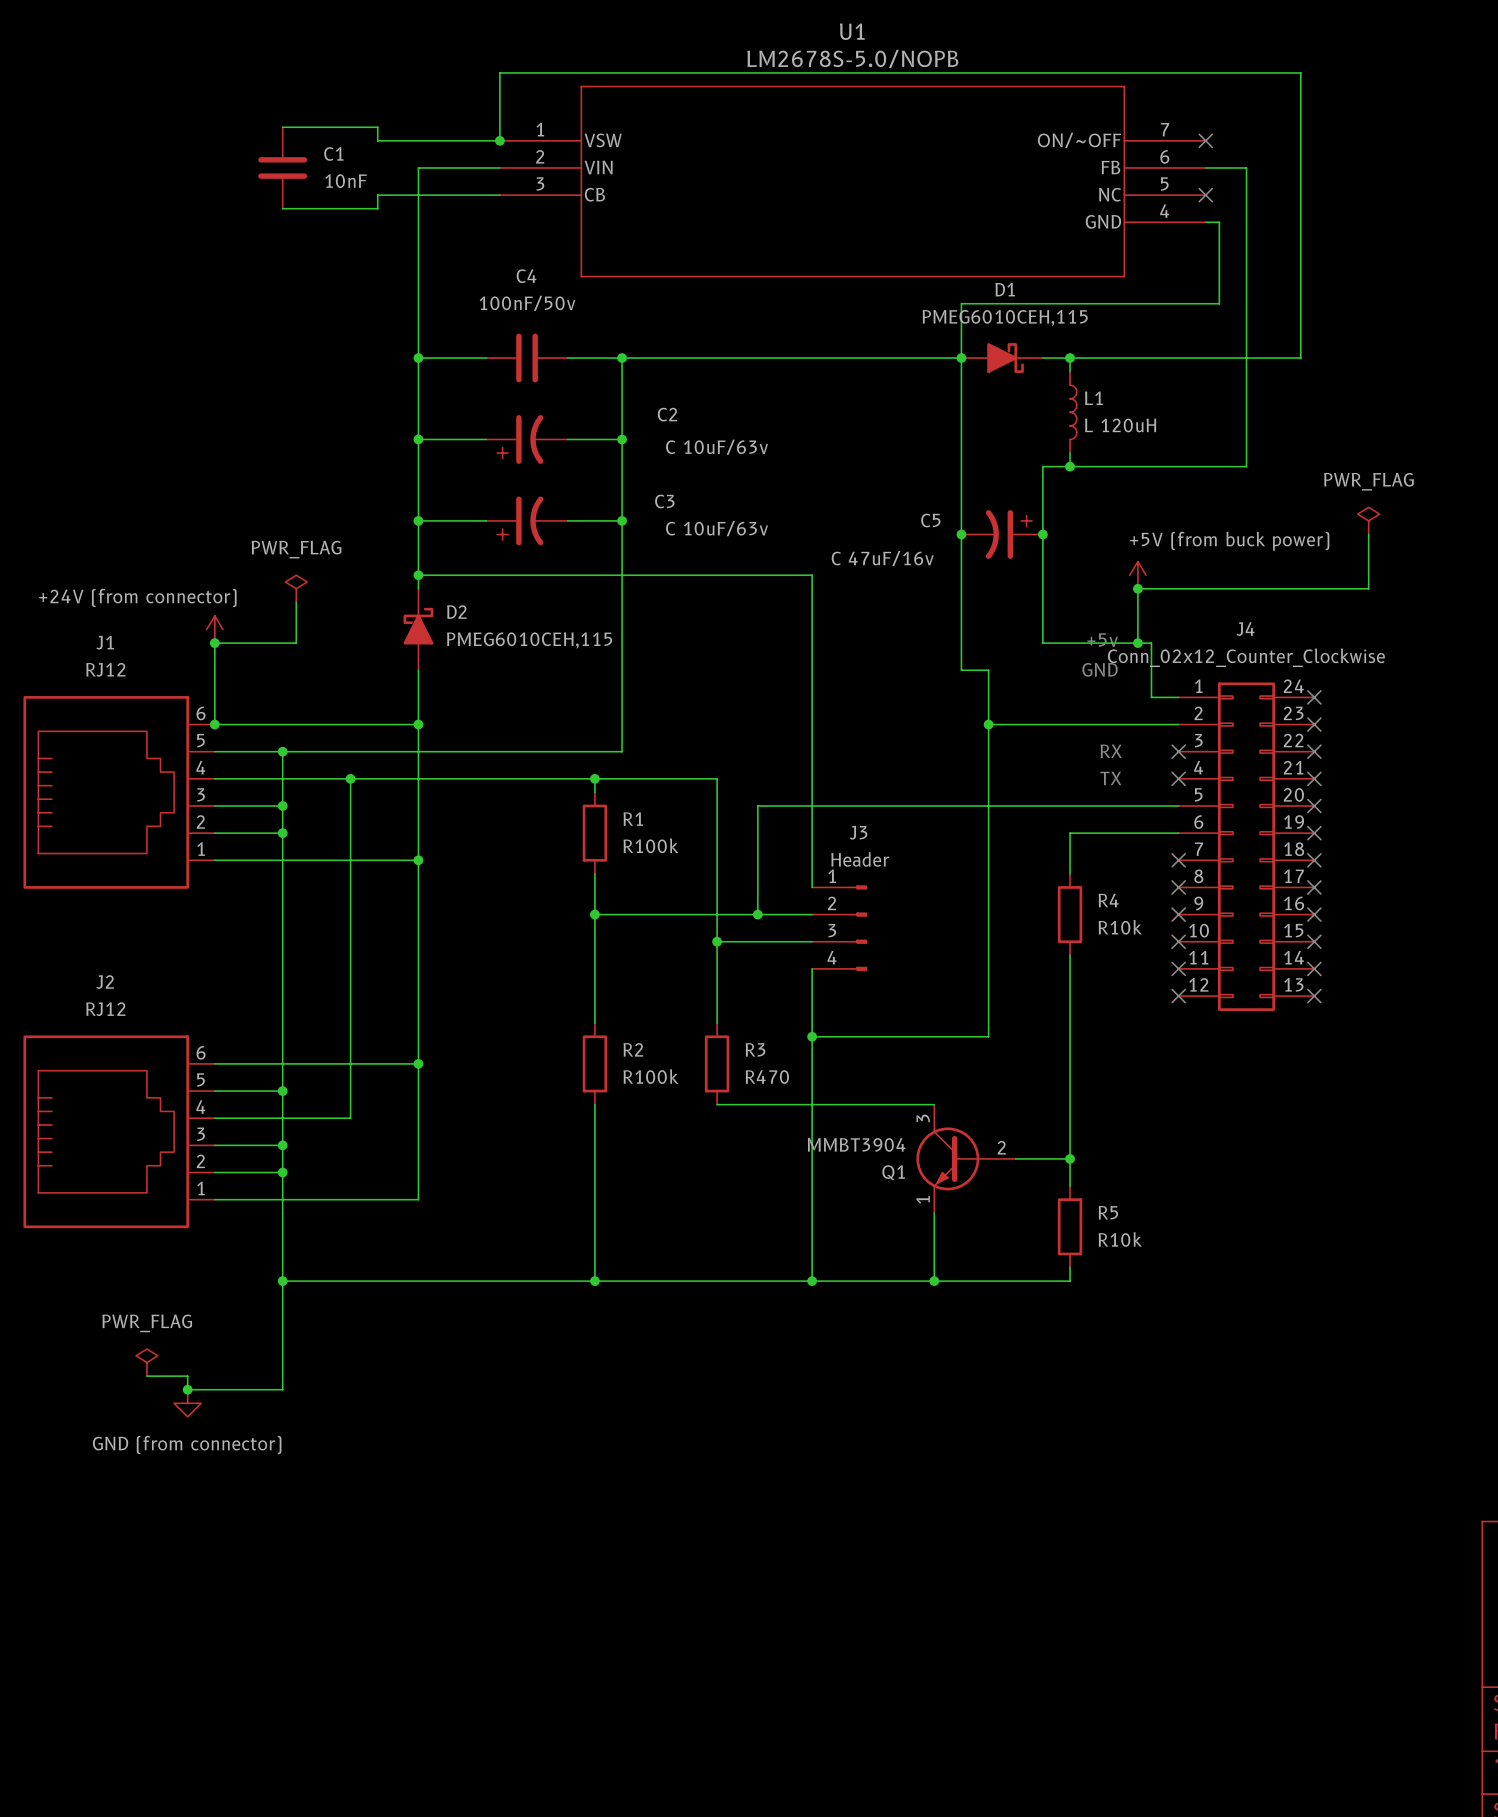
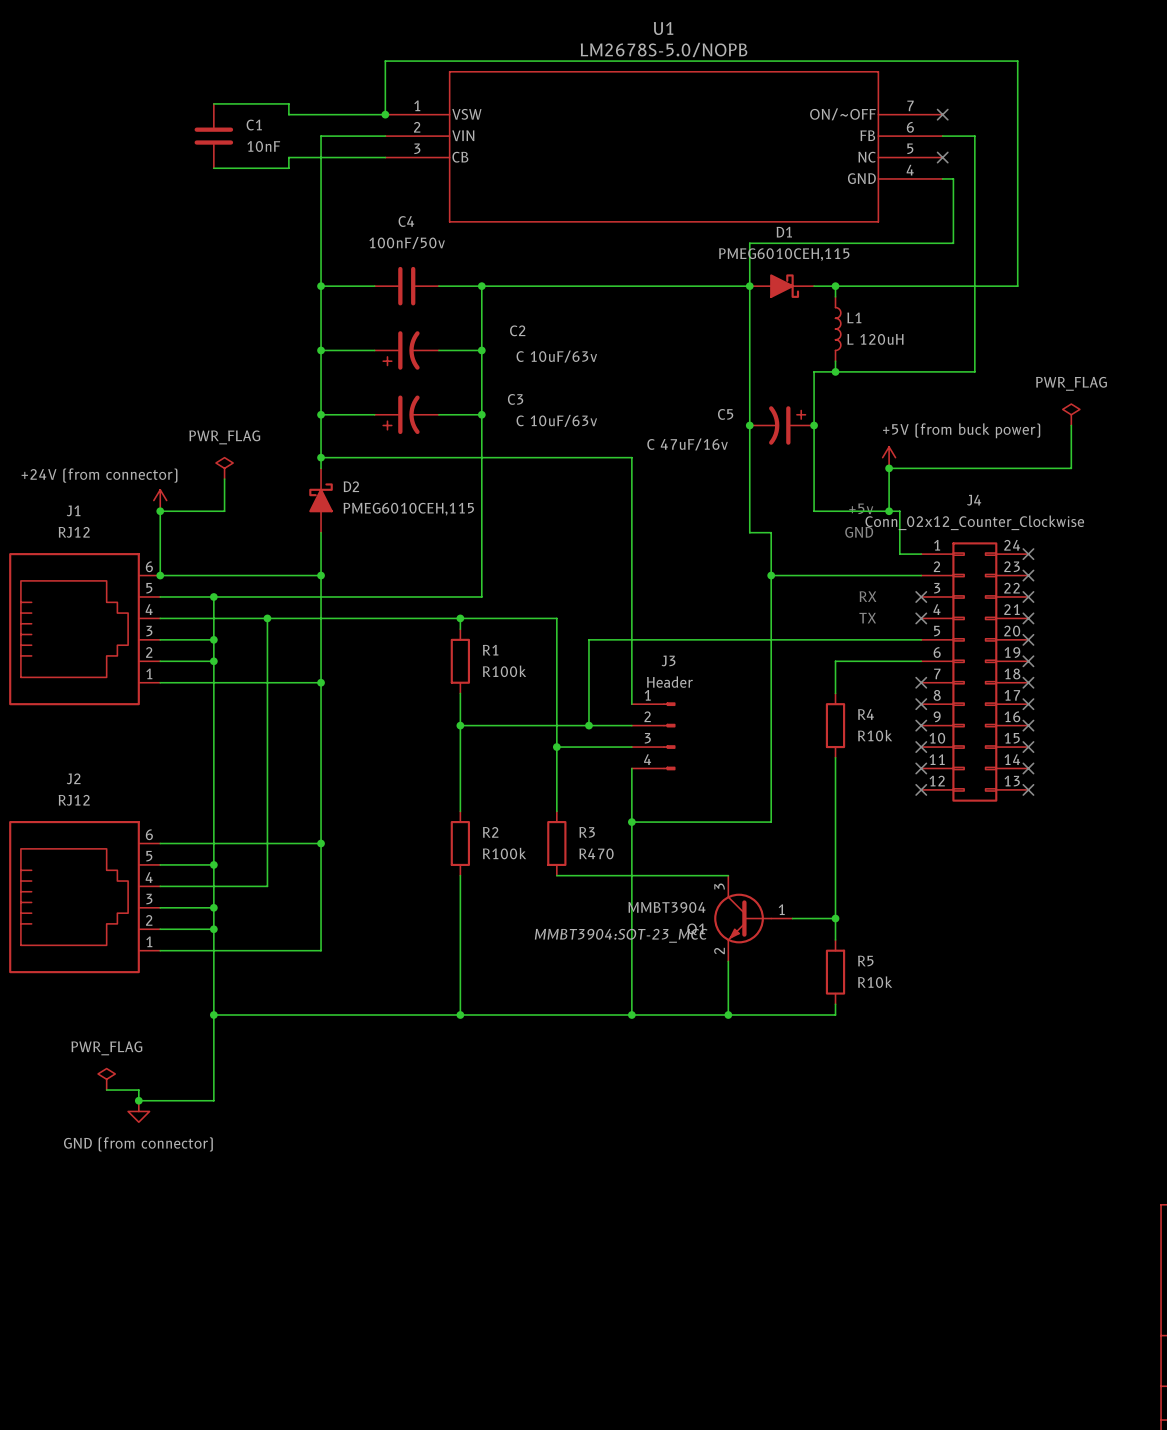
Q1 pin number: 2 (1001, 1147) -> 1 (781, 909)
Q1 text: none -> MMBT3904:SOT-23_MCC (621, 935)
Q1 pin number: 1 (923, 1199) -> 2 (719, 951)

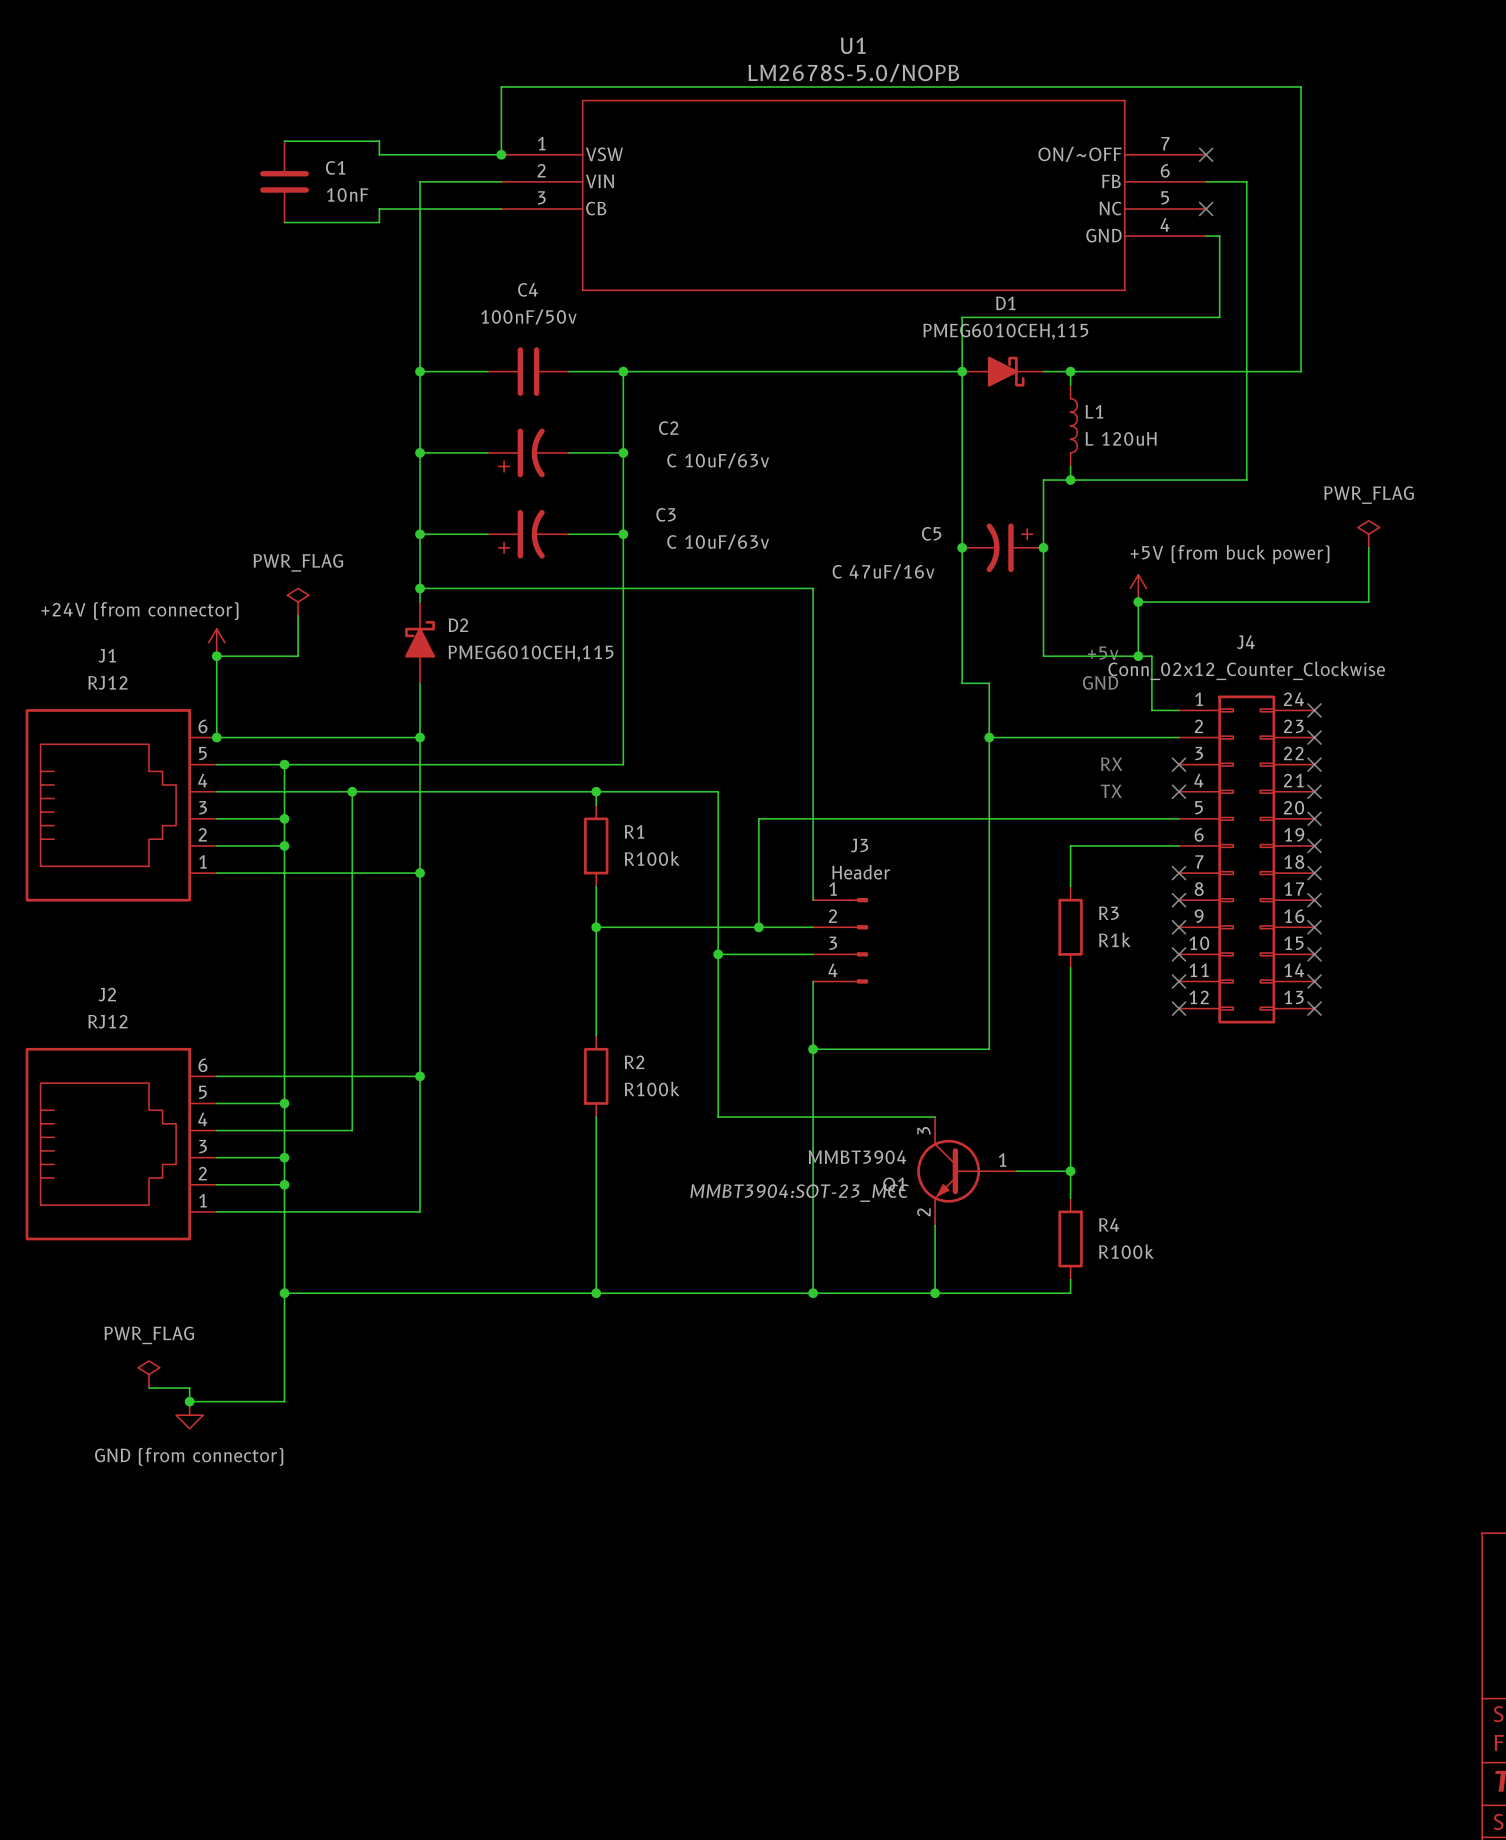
R4 name: R4 (865, 714) -> R3 (1108, 913)
R4 value: R10k (875, 735) -> R1k (1114, 939)
wire: none -> (718, 1035) (718, 1117)
R3: R470 (556, 843) -> none
R5 name: R5 (865, 961) -> R4 (1109, 1224)
R5 value: R10k (875, 982) -> R100k (1126, 1251)

